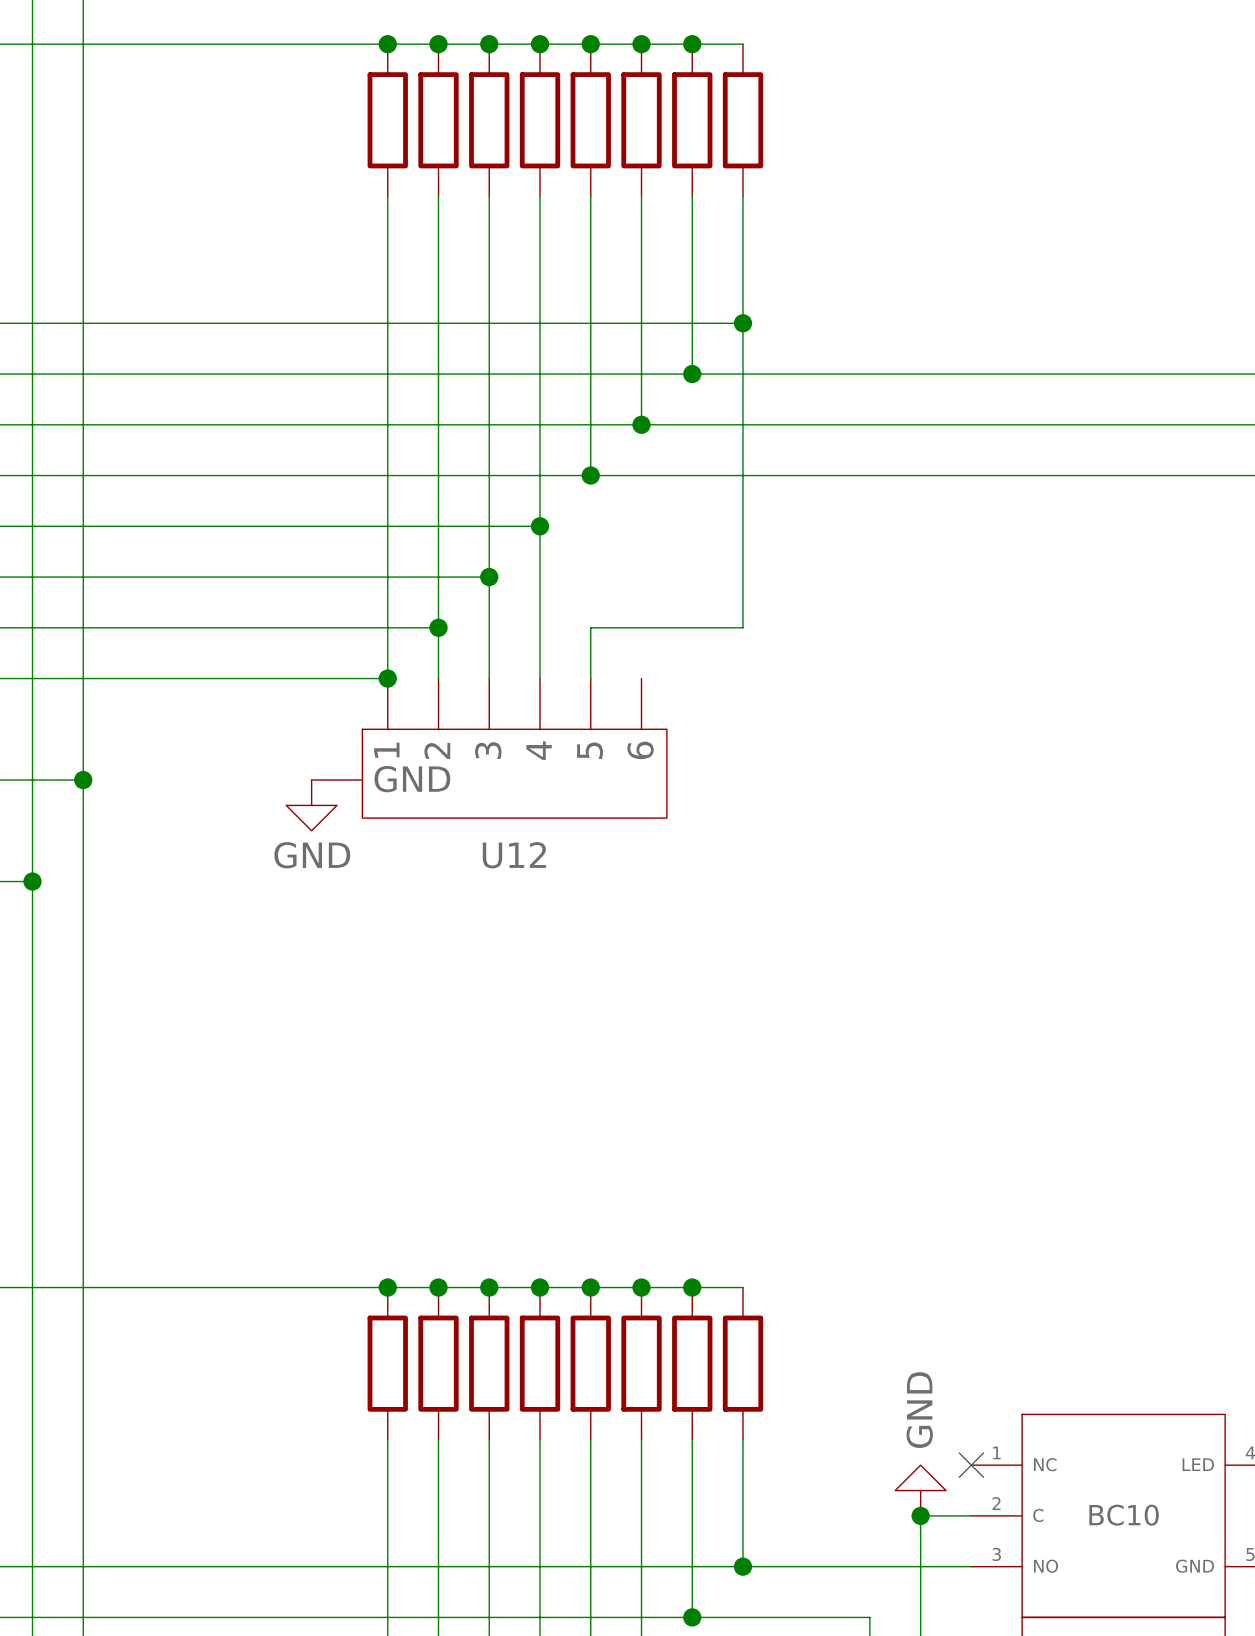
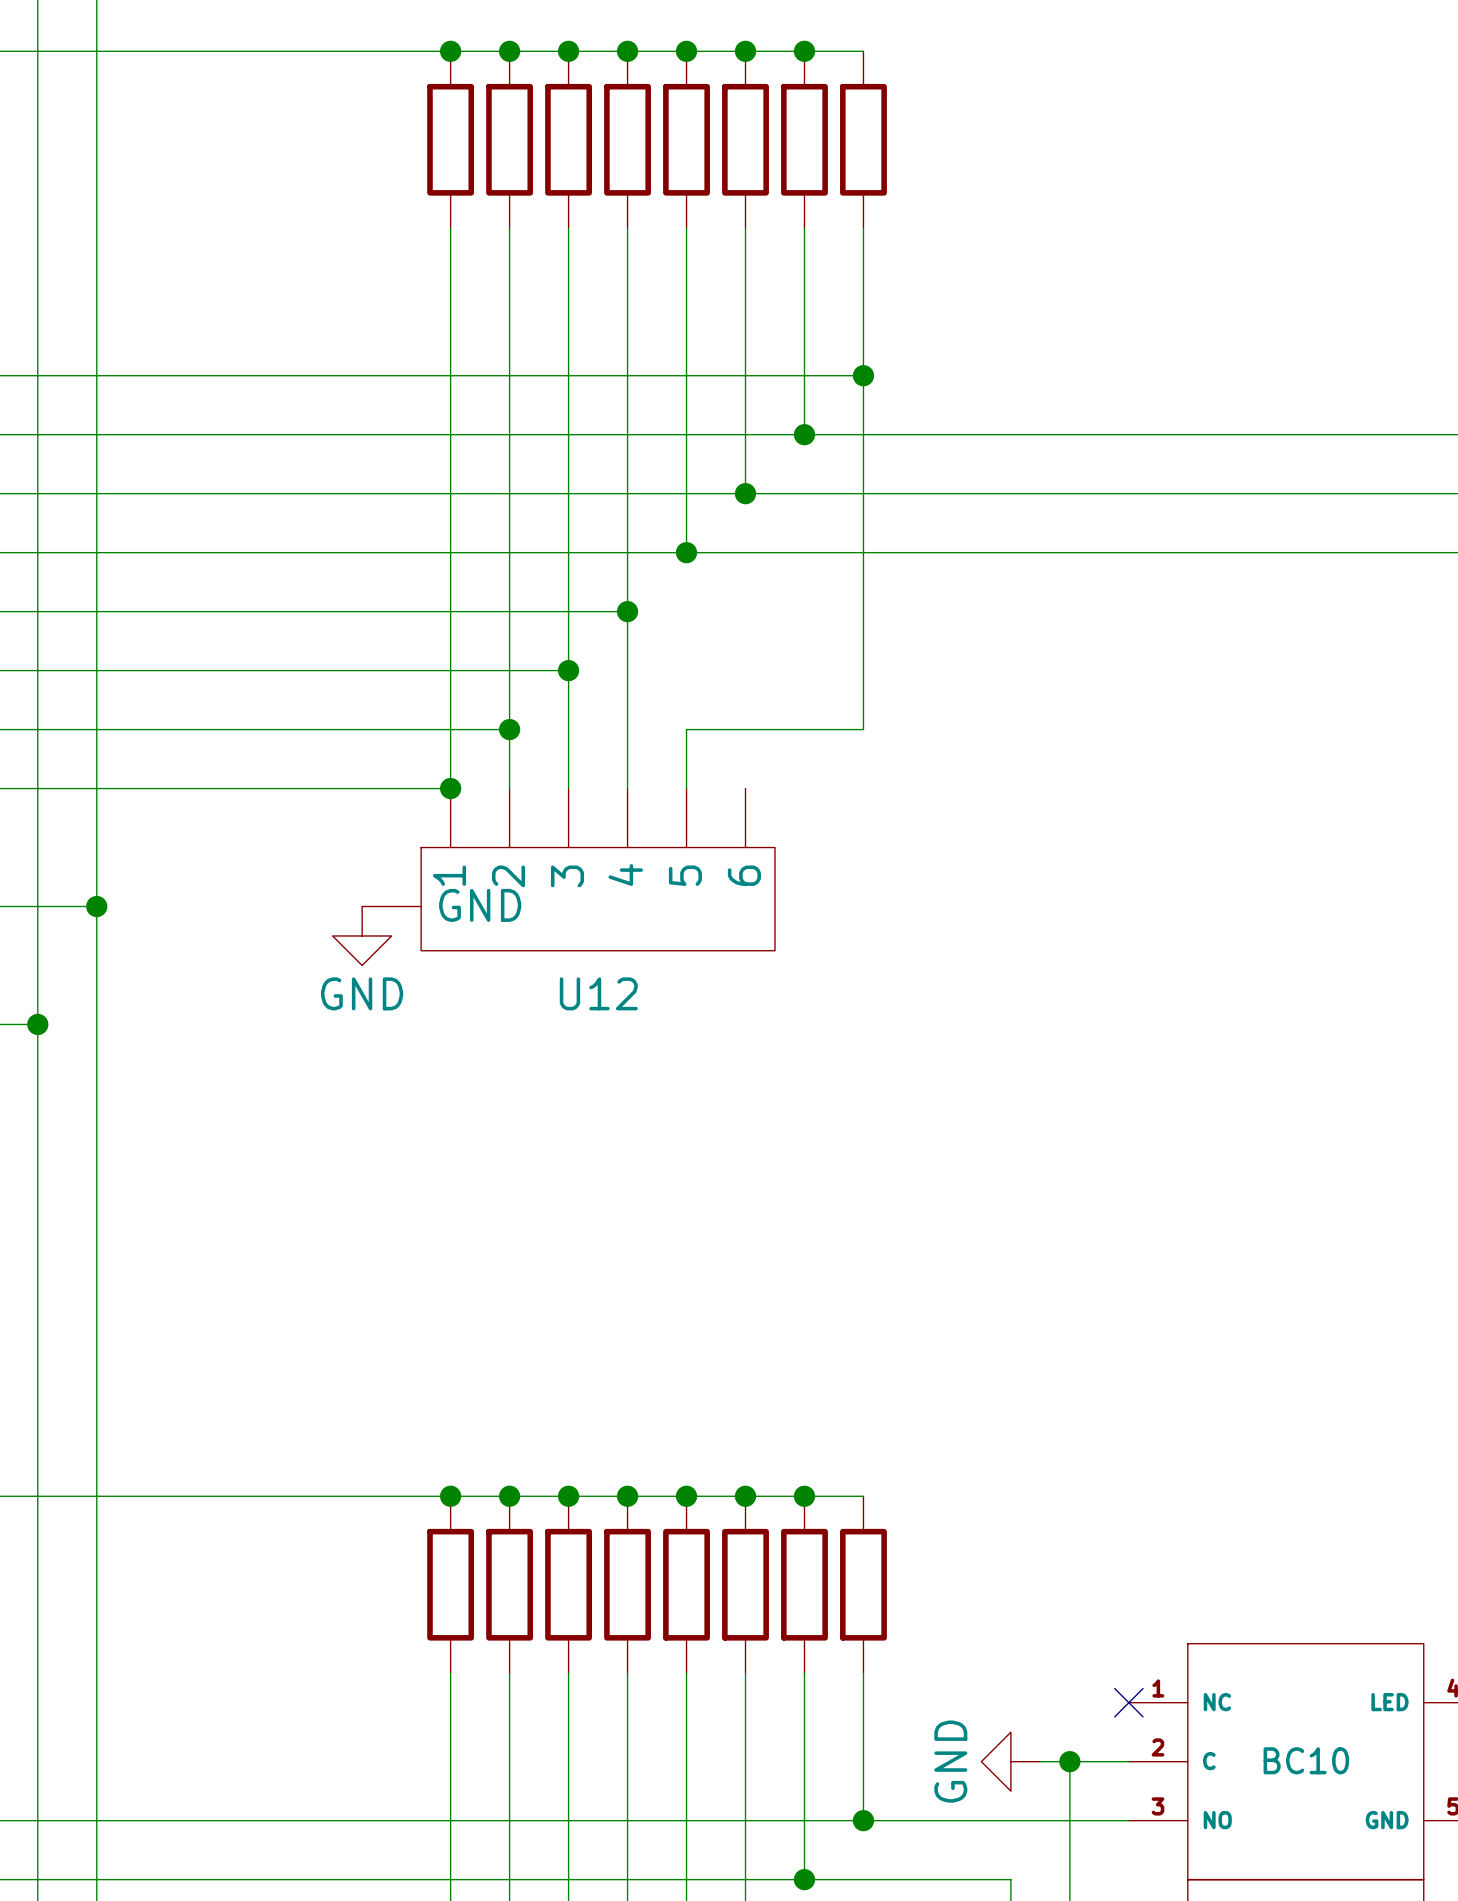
power symbol rotation: 0° (920, 1490) -> 90° counterclockwise (1010, 1761)
power symbol position: GND (920, 1490) -> GND (1010, 1761)
wire: none -> (1040, 1761) (1069, 1761)

